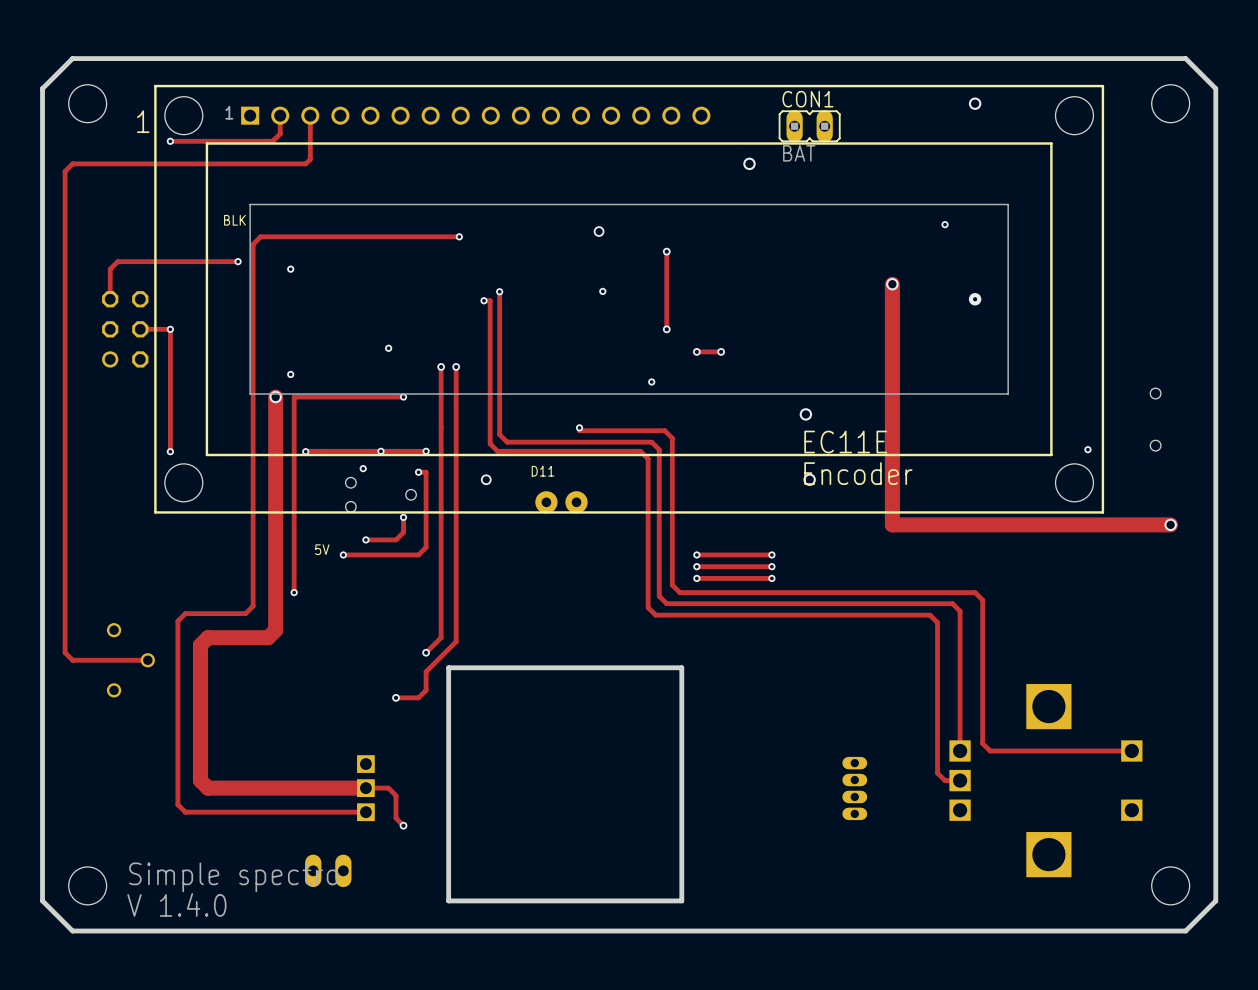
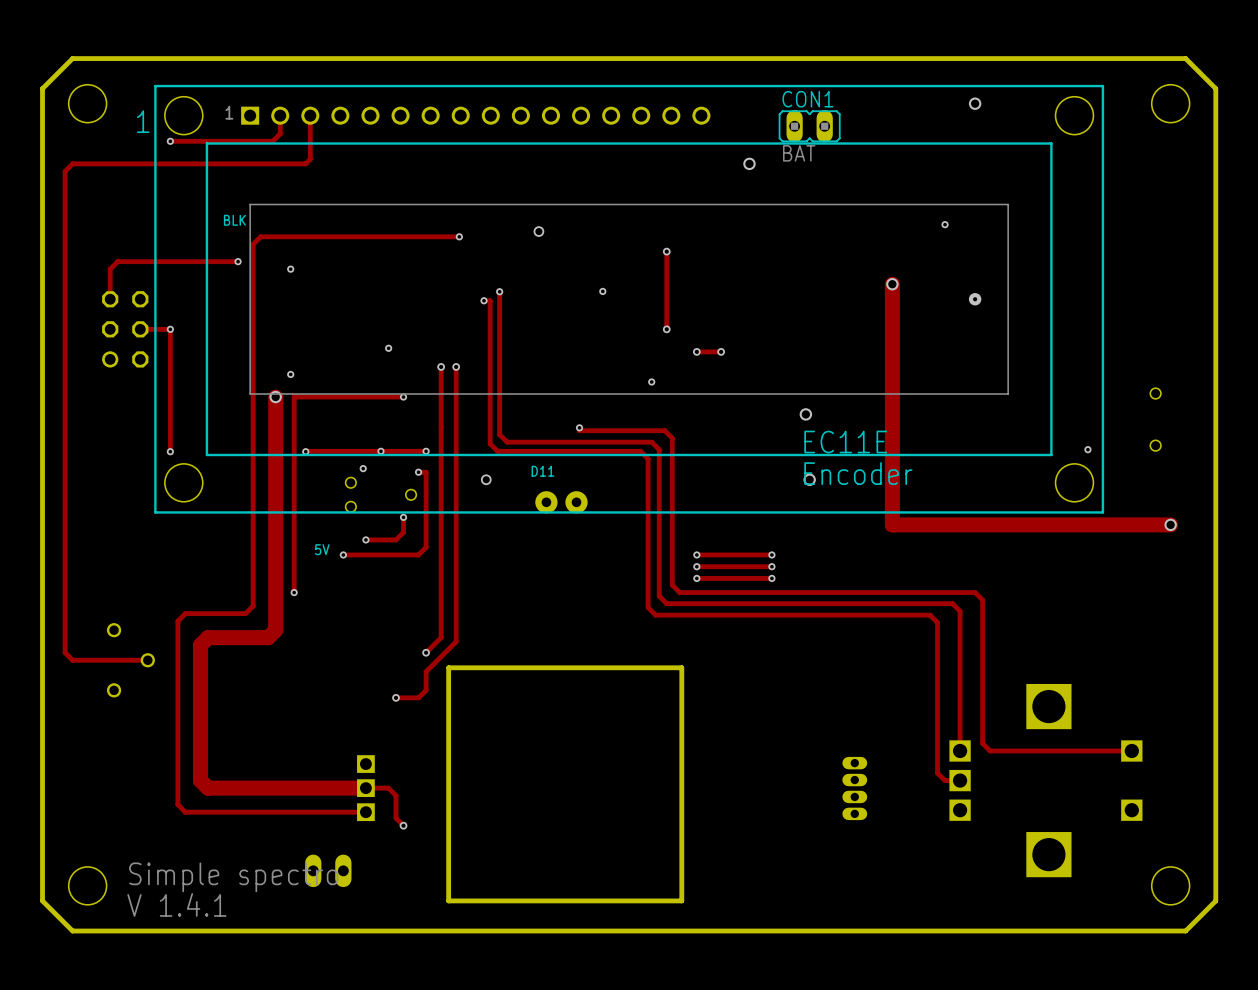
via position: (599, 231) -> (538, 231)
text: V 1.4.0 (176, 904) -> V 1.4.1 (176, 904)

